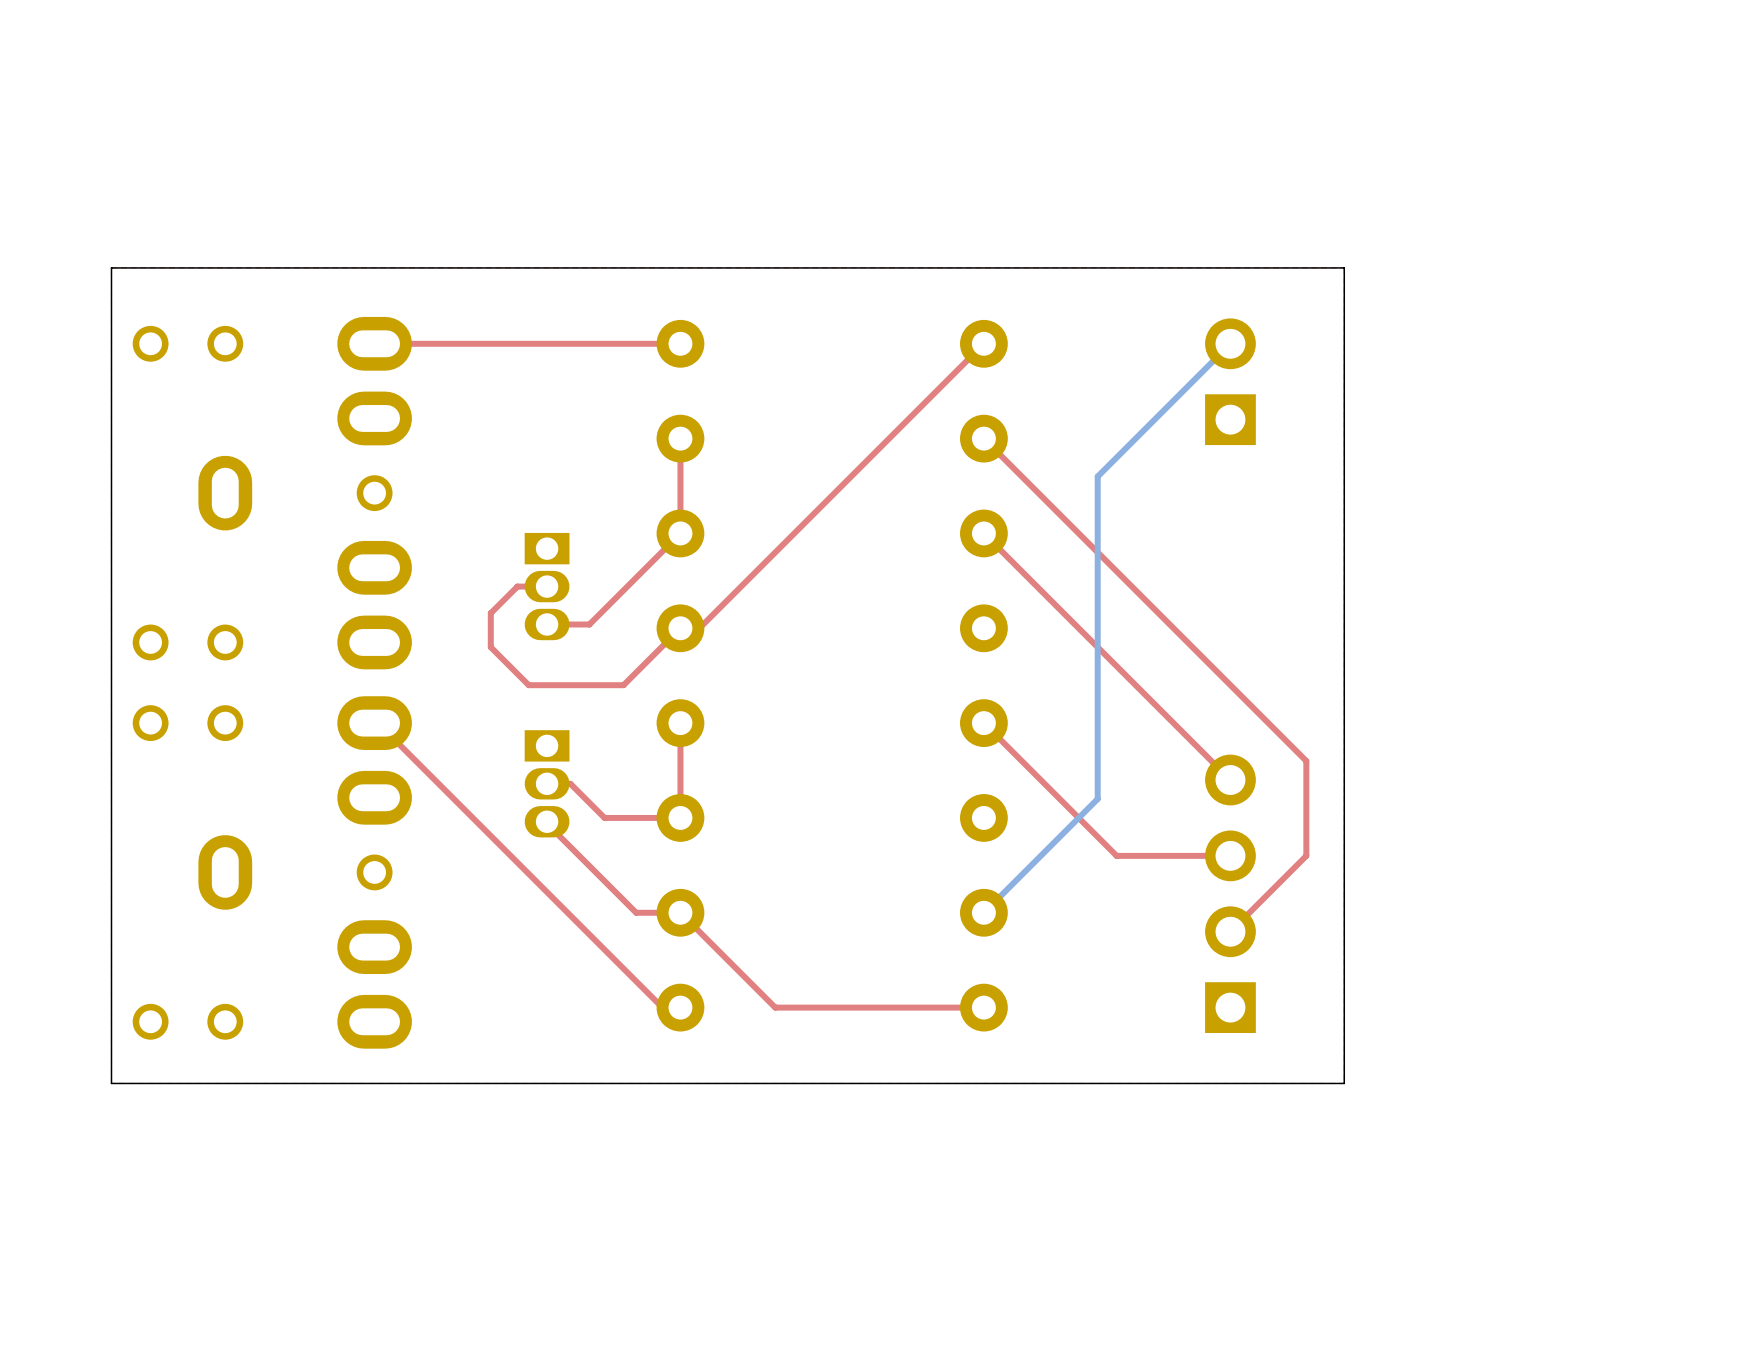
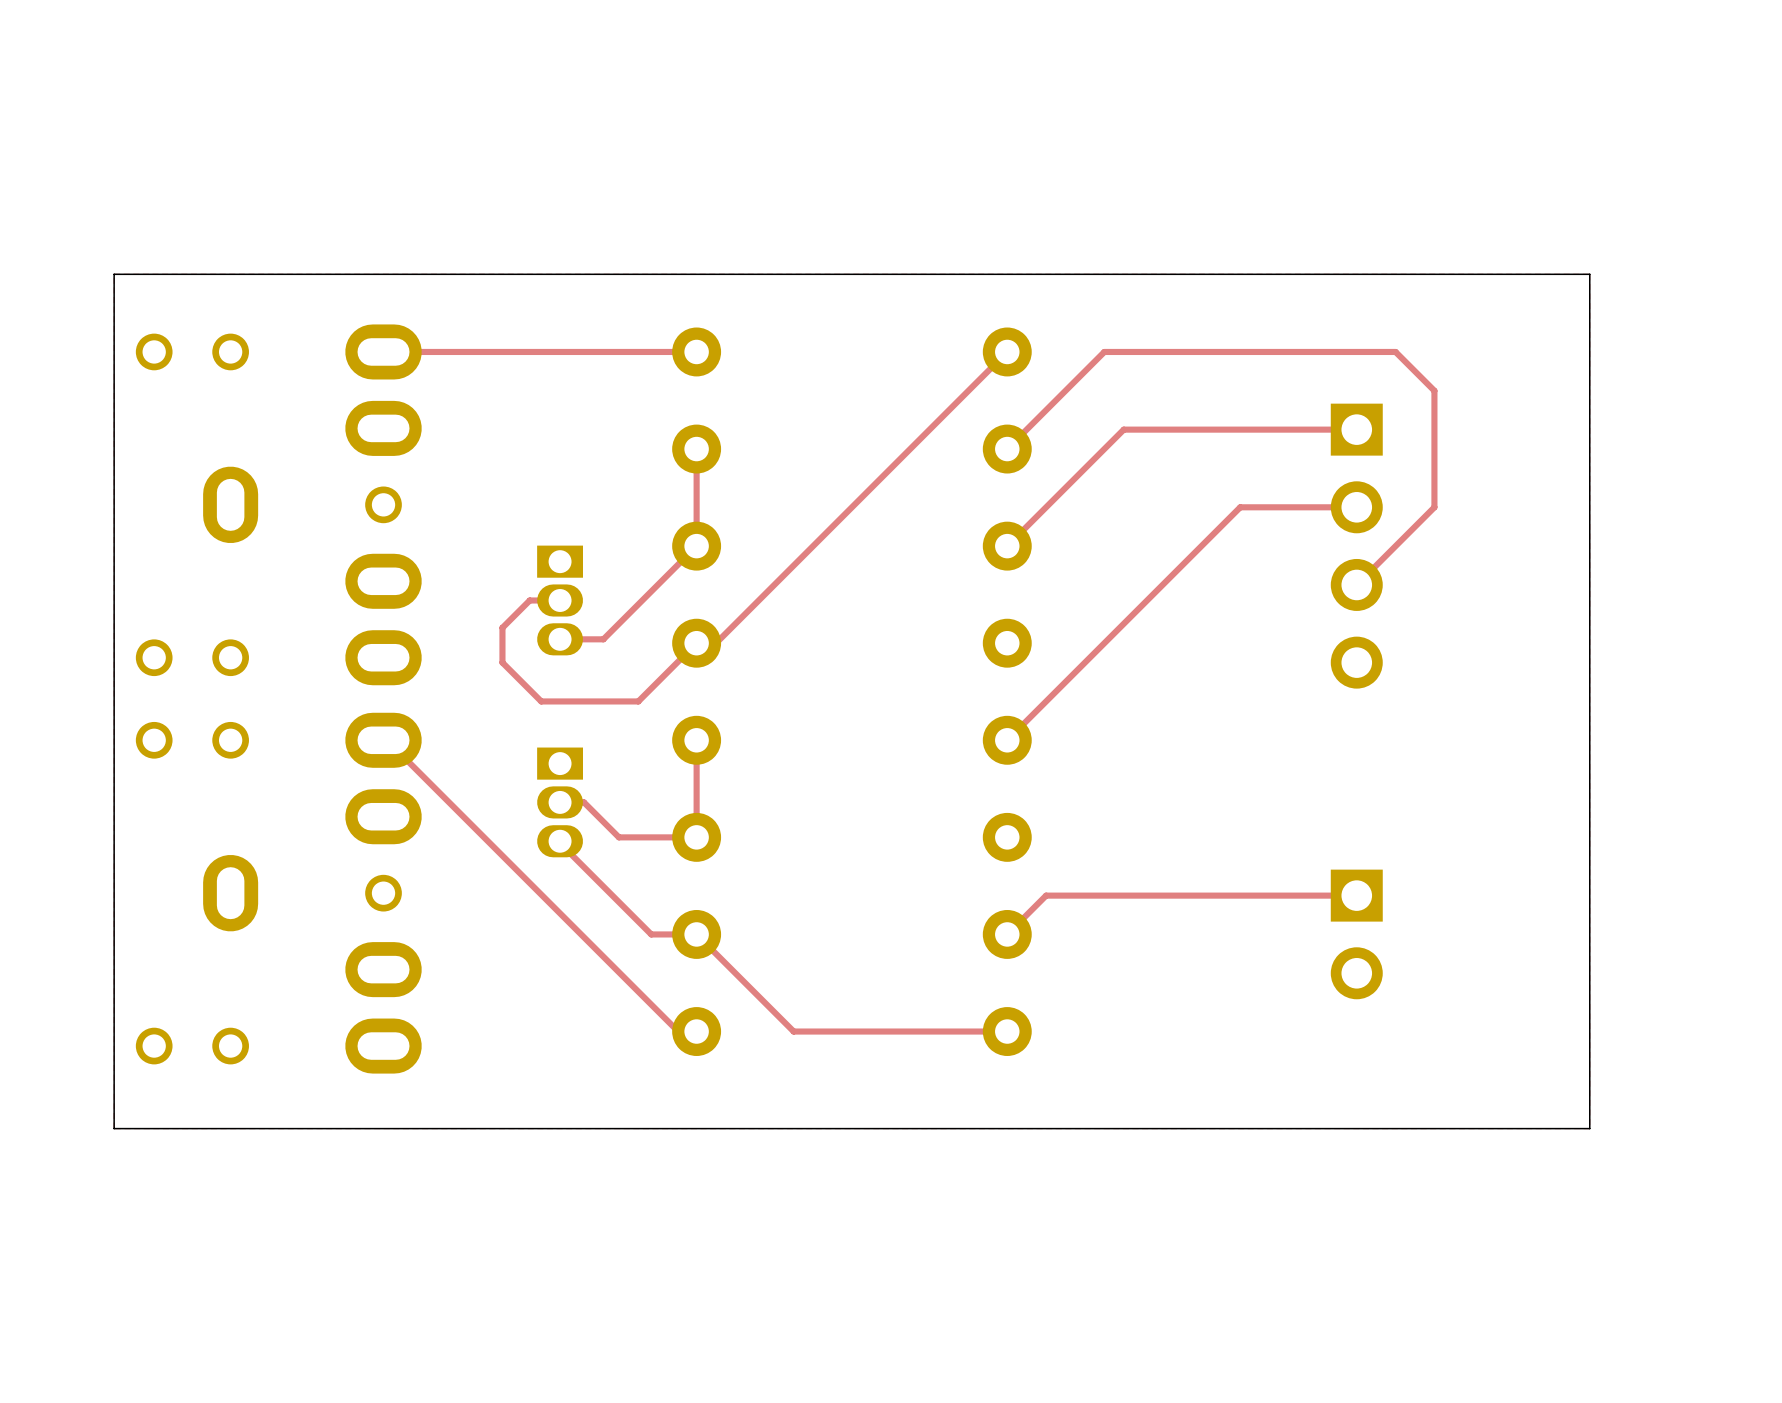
board edge: (1344, 267) (1344, 1083) (111, 1083) -> (1376, 274) (1589, 274) (1589, 1128) (114, 1128) (114, 1109)
bottom track: (1230, 343) (1097, 476) (1097, 798) (983, 912) -> none
part rotation: 0° (1230, 381) -> 180° (1356, 934)
part position: (1230, 381) -> (1356, 934)
top track: (983, 438) (1306, 761) (1306, 855) (1230, 931) -> (1007, 449) (1104, 351) (1395, 351) (1434, 390) (1434, 507) (1356, 584)
top track: (983, 533) (1230, 780) -> (1007, 546) (1123, 429) (1356, 429)
top track: (983, 723) (1116, 855) (1230, 855) -> (1007, 740) (1240, 507) (1356, 507)
top track: none -> (1356, 895) (1046, 895) (1007, 934)
part rotation: 0° (1230, 893) -> 180° (1356, 546)
part position: (1230, 893) -> (1356, 546)

